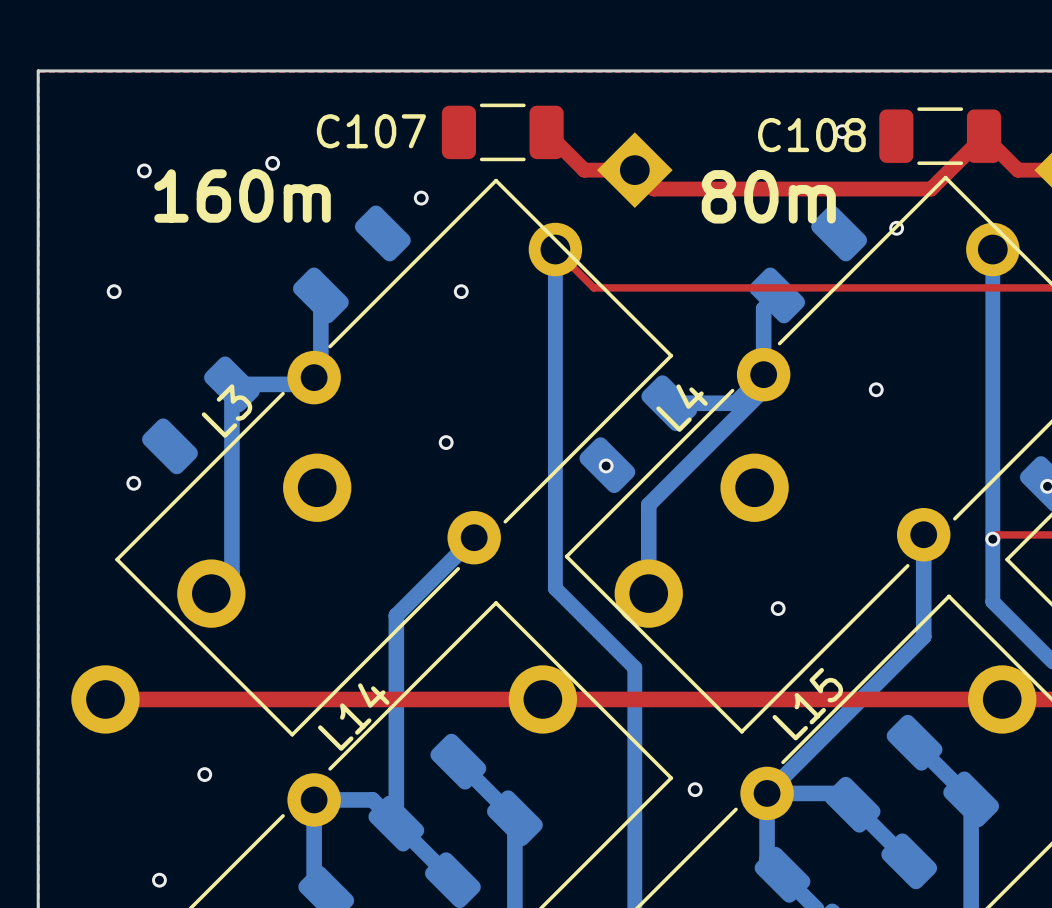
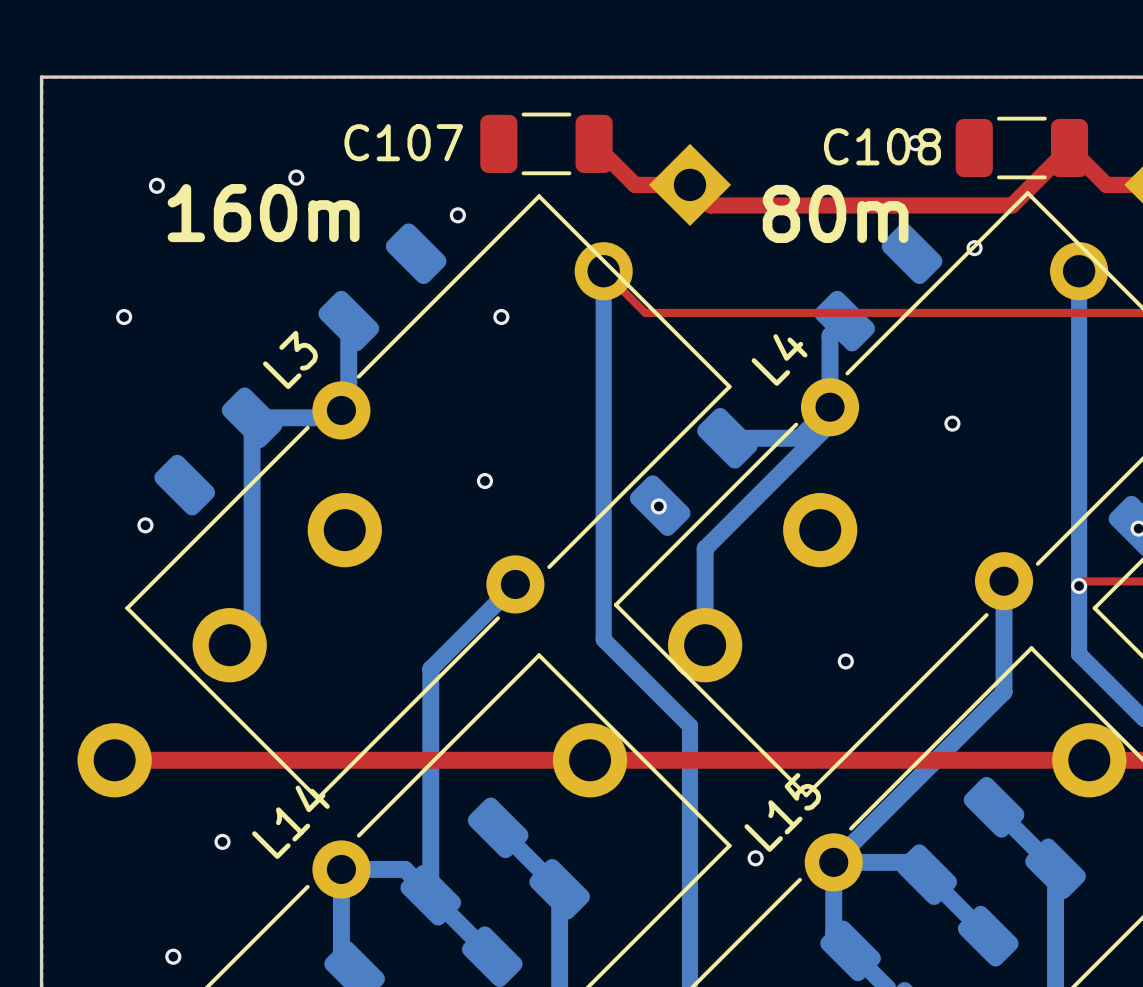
L4 name position: L4 (682, 408) -> L4 (779, 360)
L3 name position: L3 (227, 411) -> L3 (290, 359)
L15 name position: L15 (807, 704) -> L15 (782, 812)
L14 name position: L14 (353, 717) -> L14 (290, 822)

